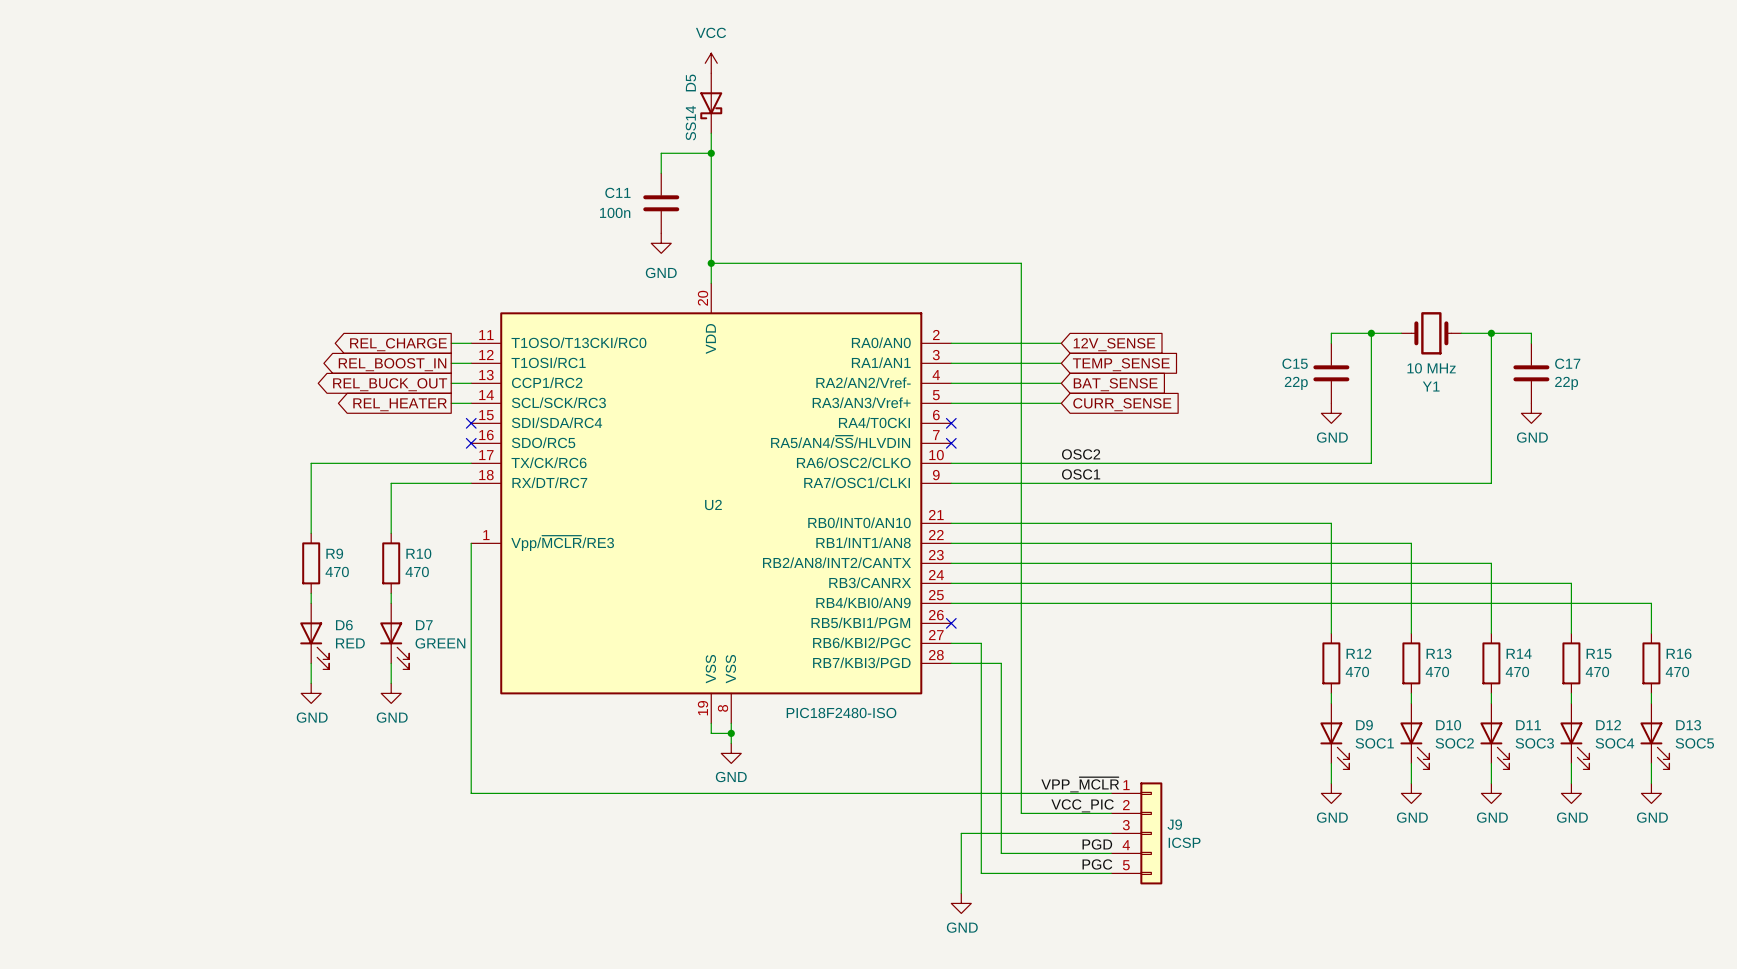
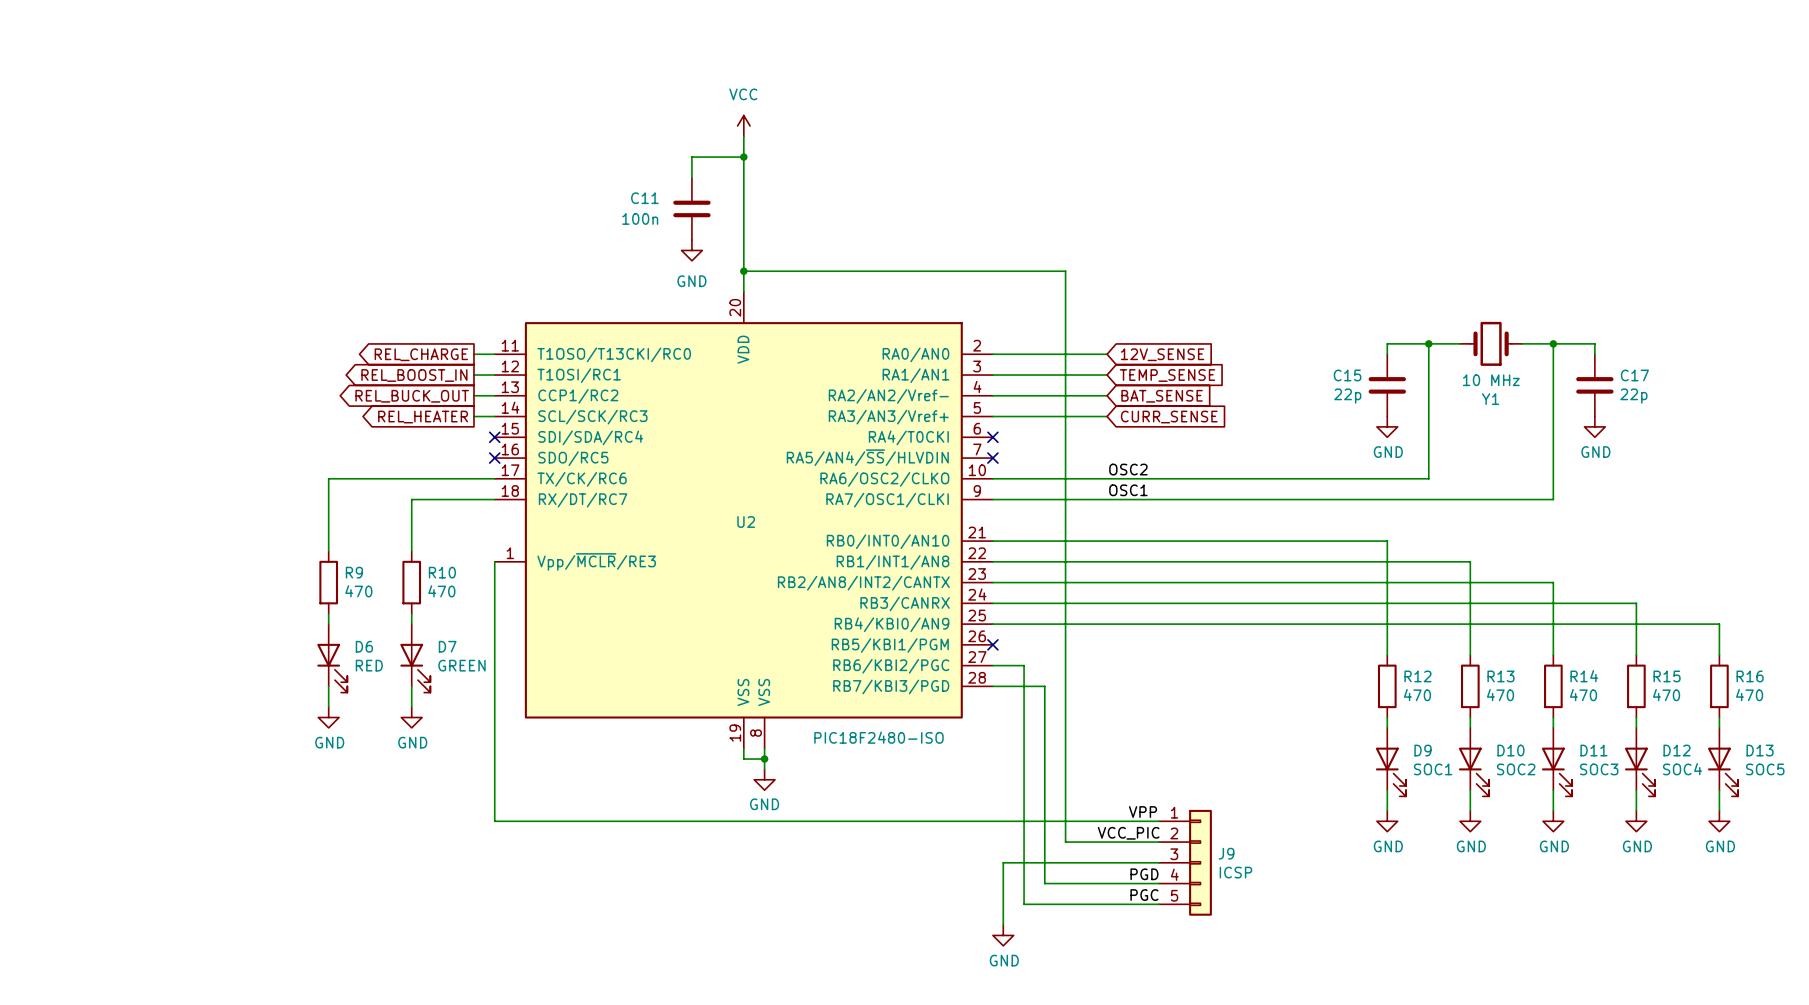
power symbol position: VCC (711, 63) -> VCC (743, 125)
D5: SS14 (711, 103) -> none
label: VPP_~{MCLR} (1080, 784) -> none
label: none -> VPP (1142, 812)

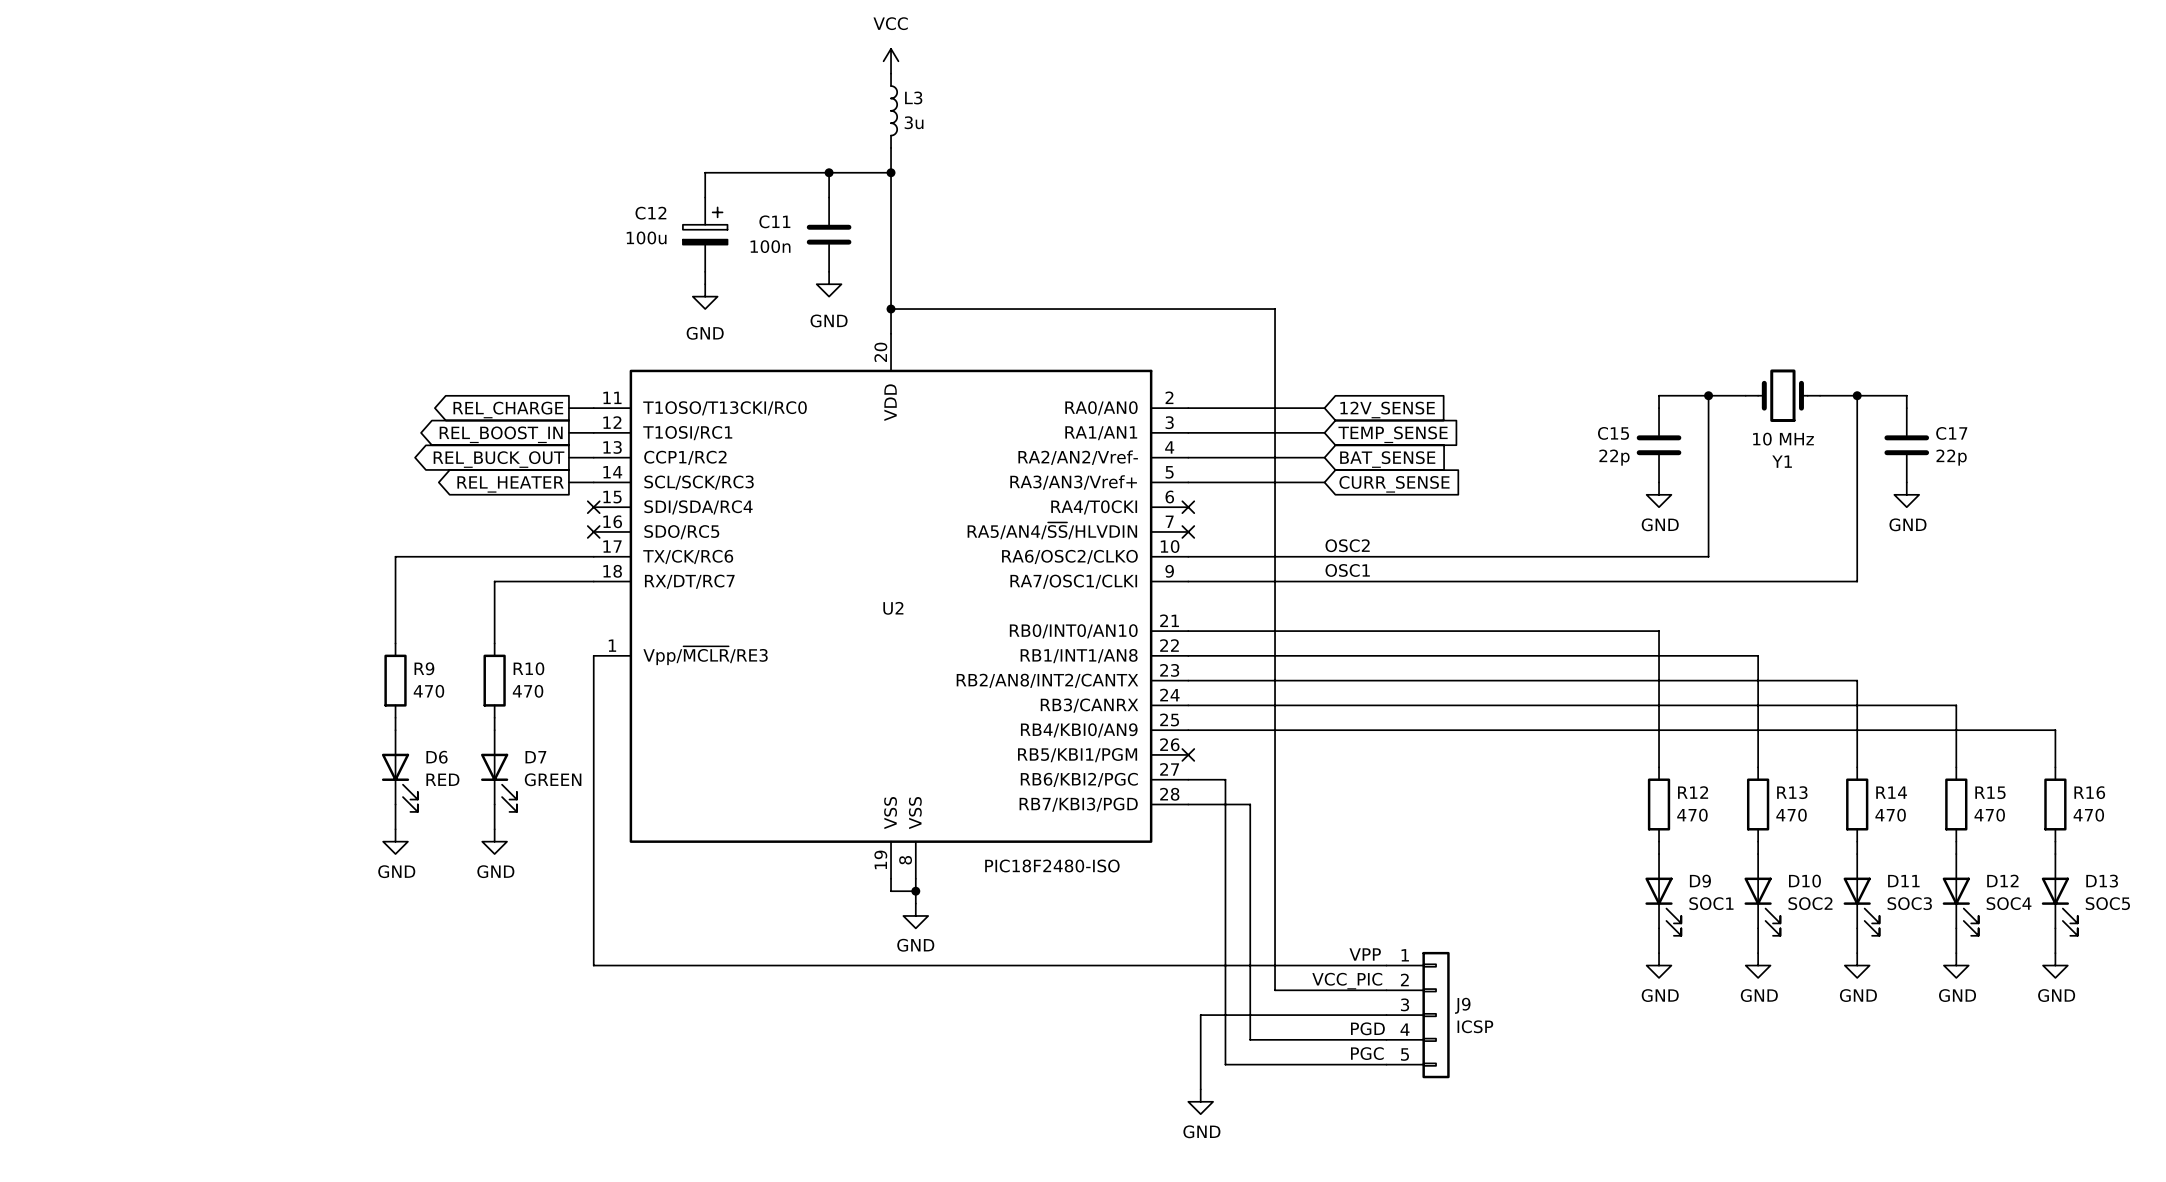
L3: none -> 3u (894, 110)
power symbol position: VCC (743, 125) -> VCC (891, 61)
wire: none -> (829, 172) (705, 172) (705, 197)
junction: none -> (829, 172)
C12: none -> 100u (705, 234)
wire: none -> (705, 271) (705, 284)
power symbol: none -> GND (705, 296)

